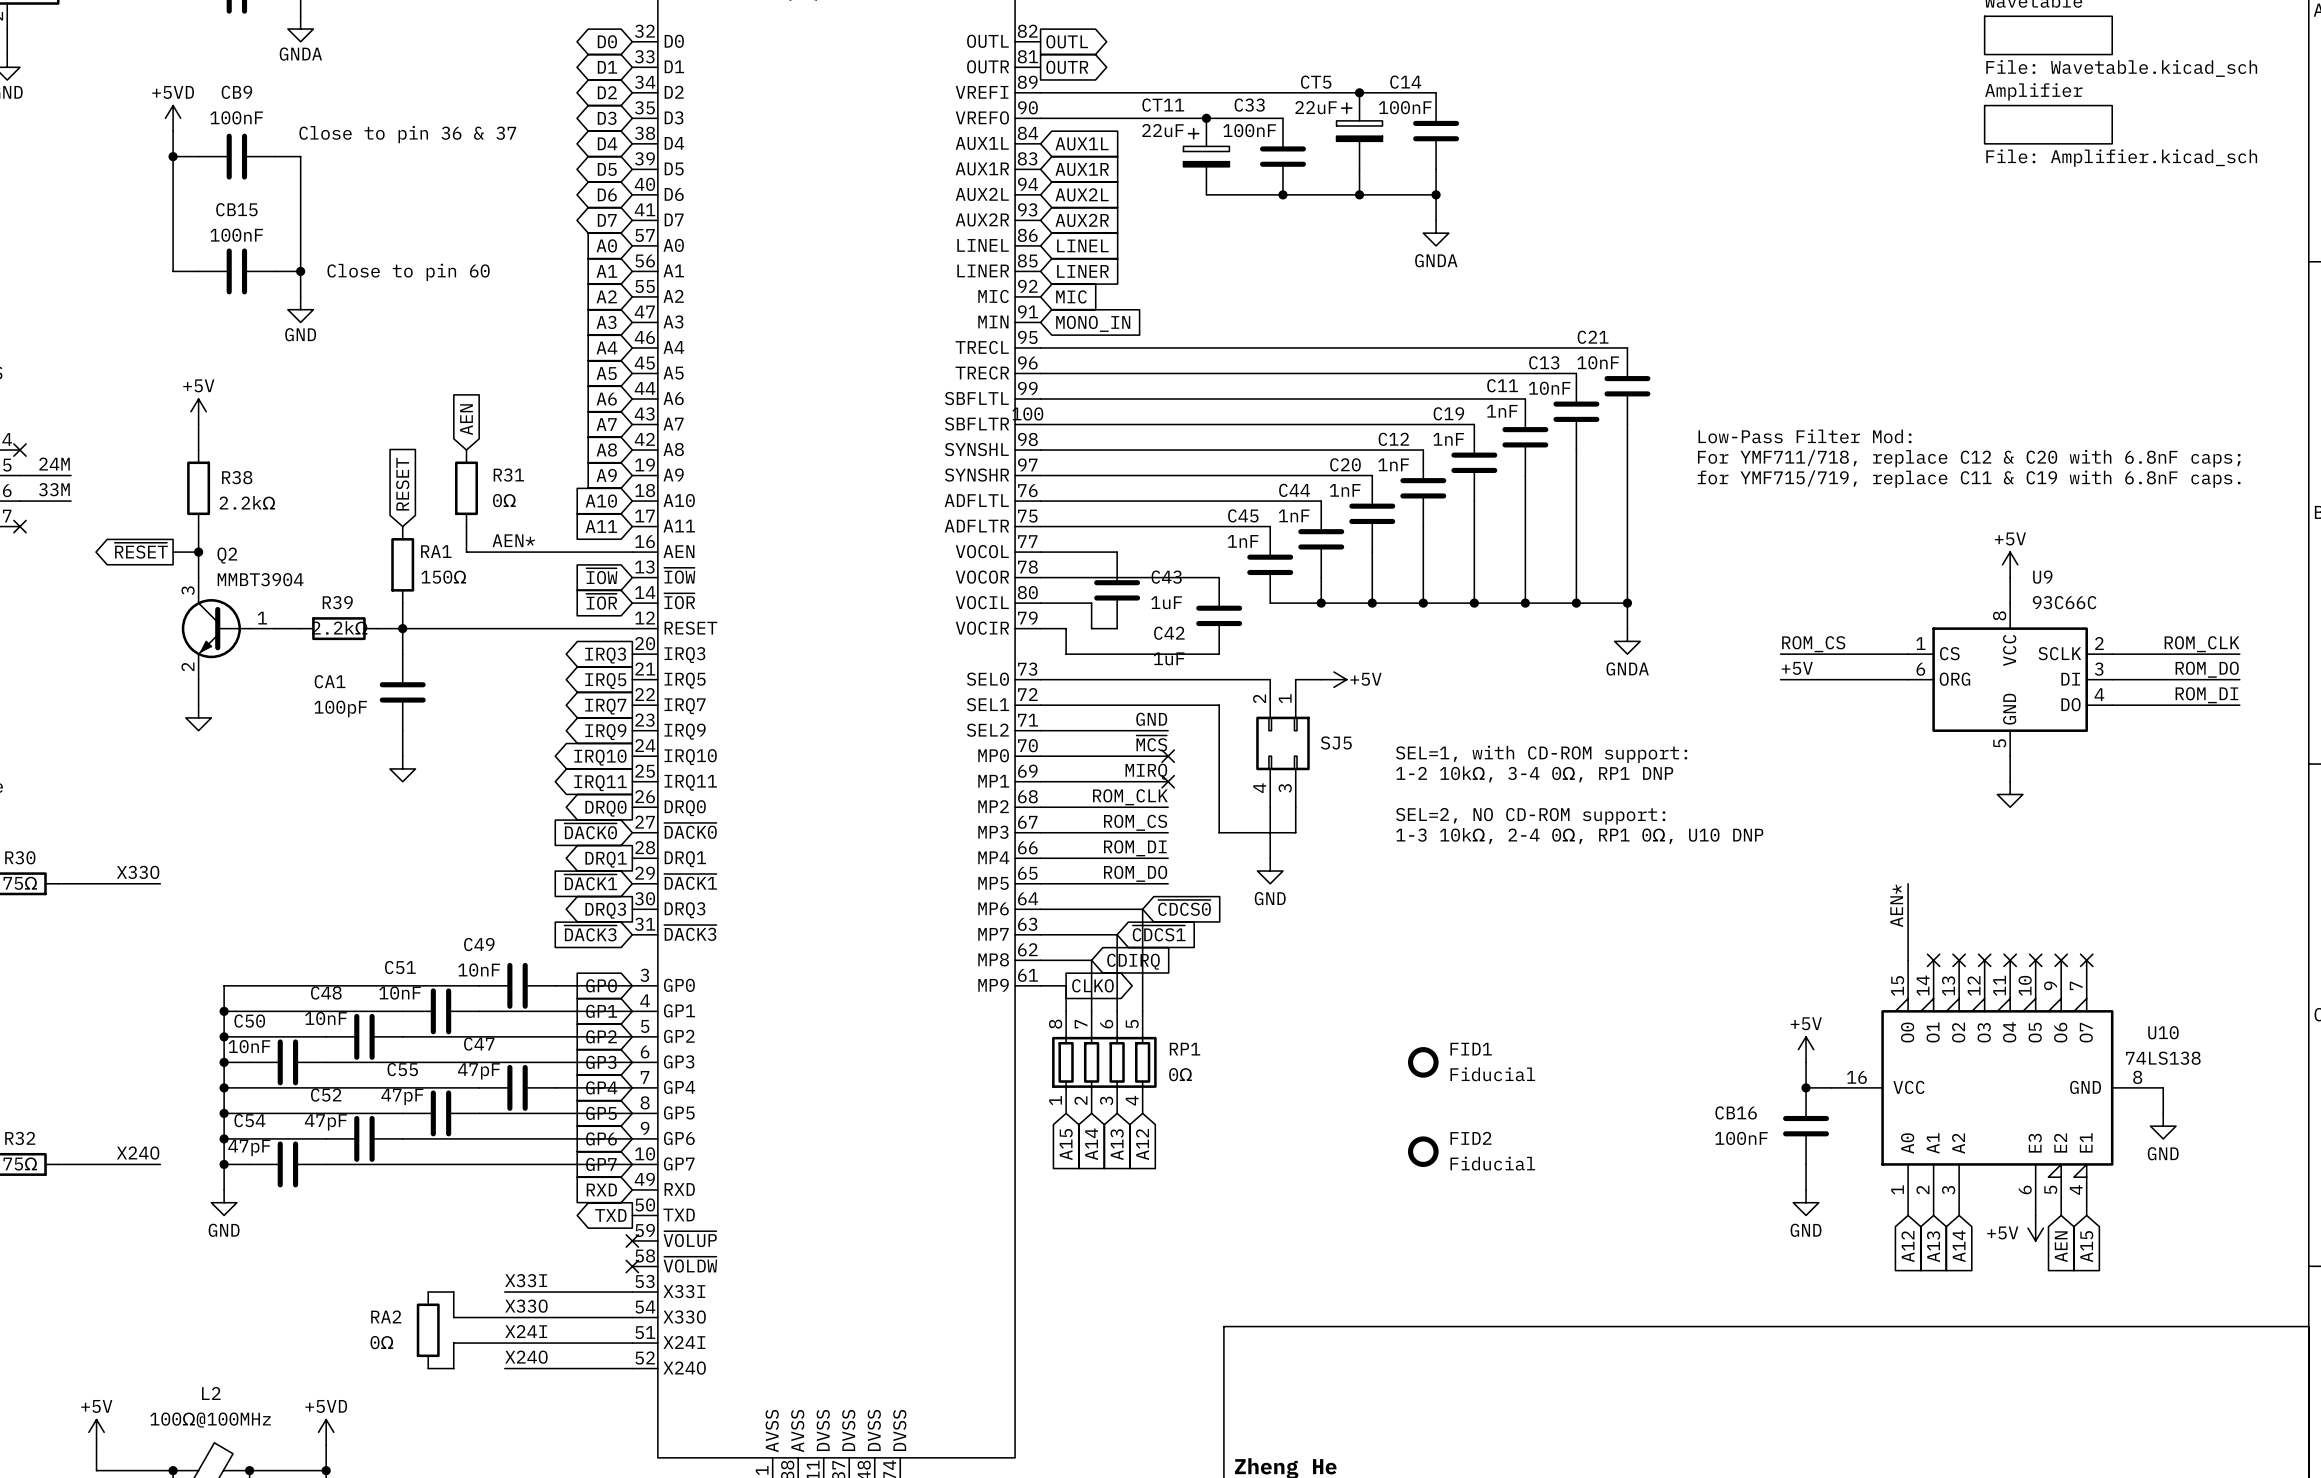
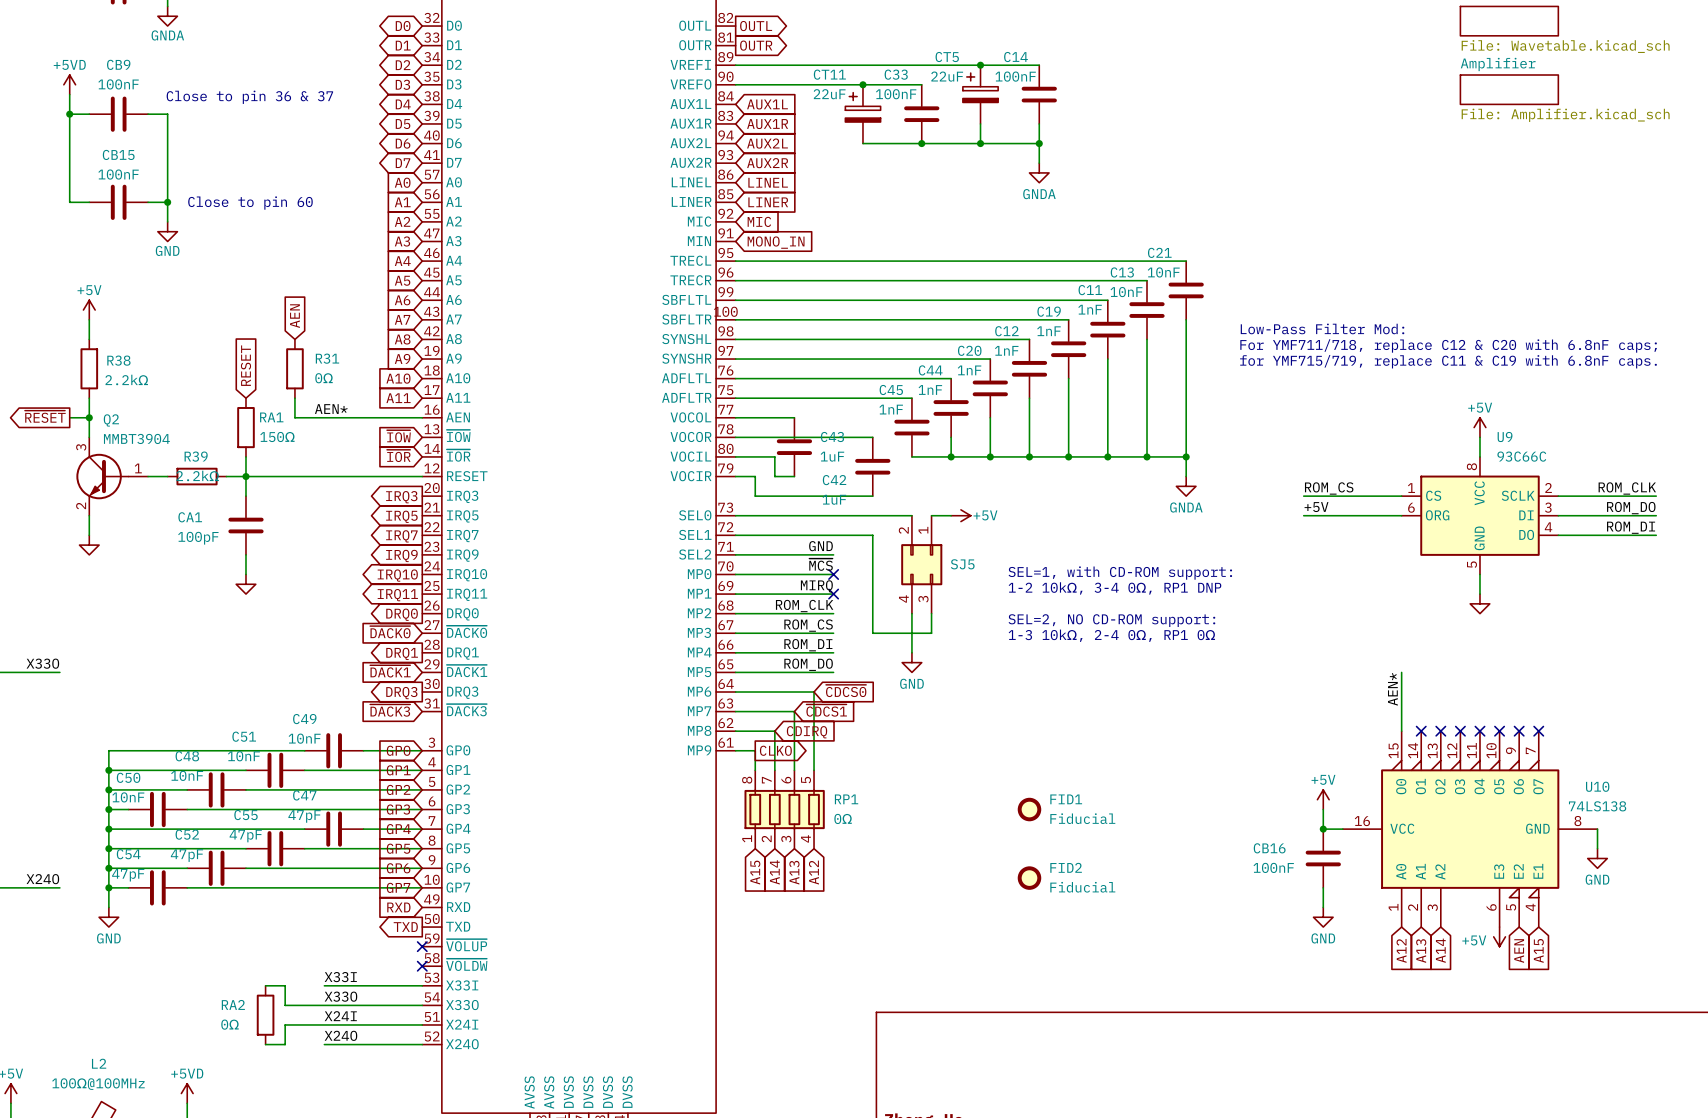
text: 1-3 10kΩ, 2-4 0Ω, RP1 0Ω, U10 DNP (1579, 836) -> 1-3 10kΩ, 2-4 0Ω, RP1 0Ω (1111, 635)

